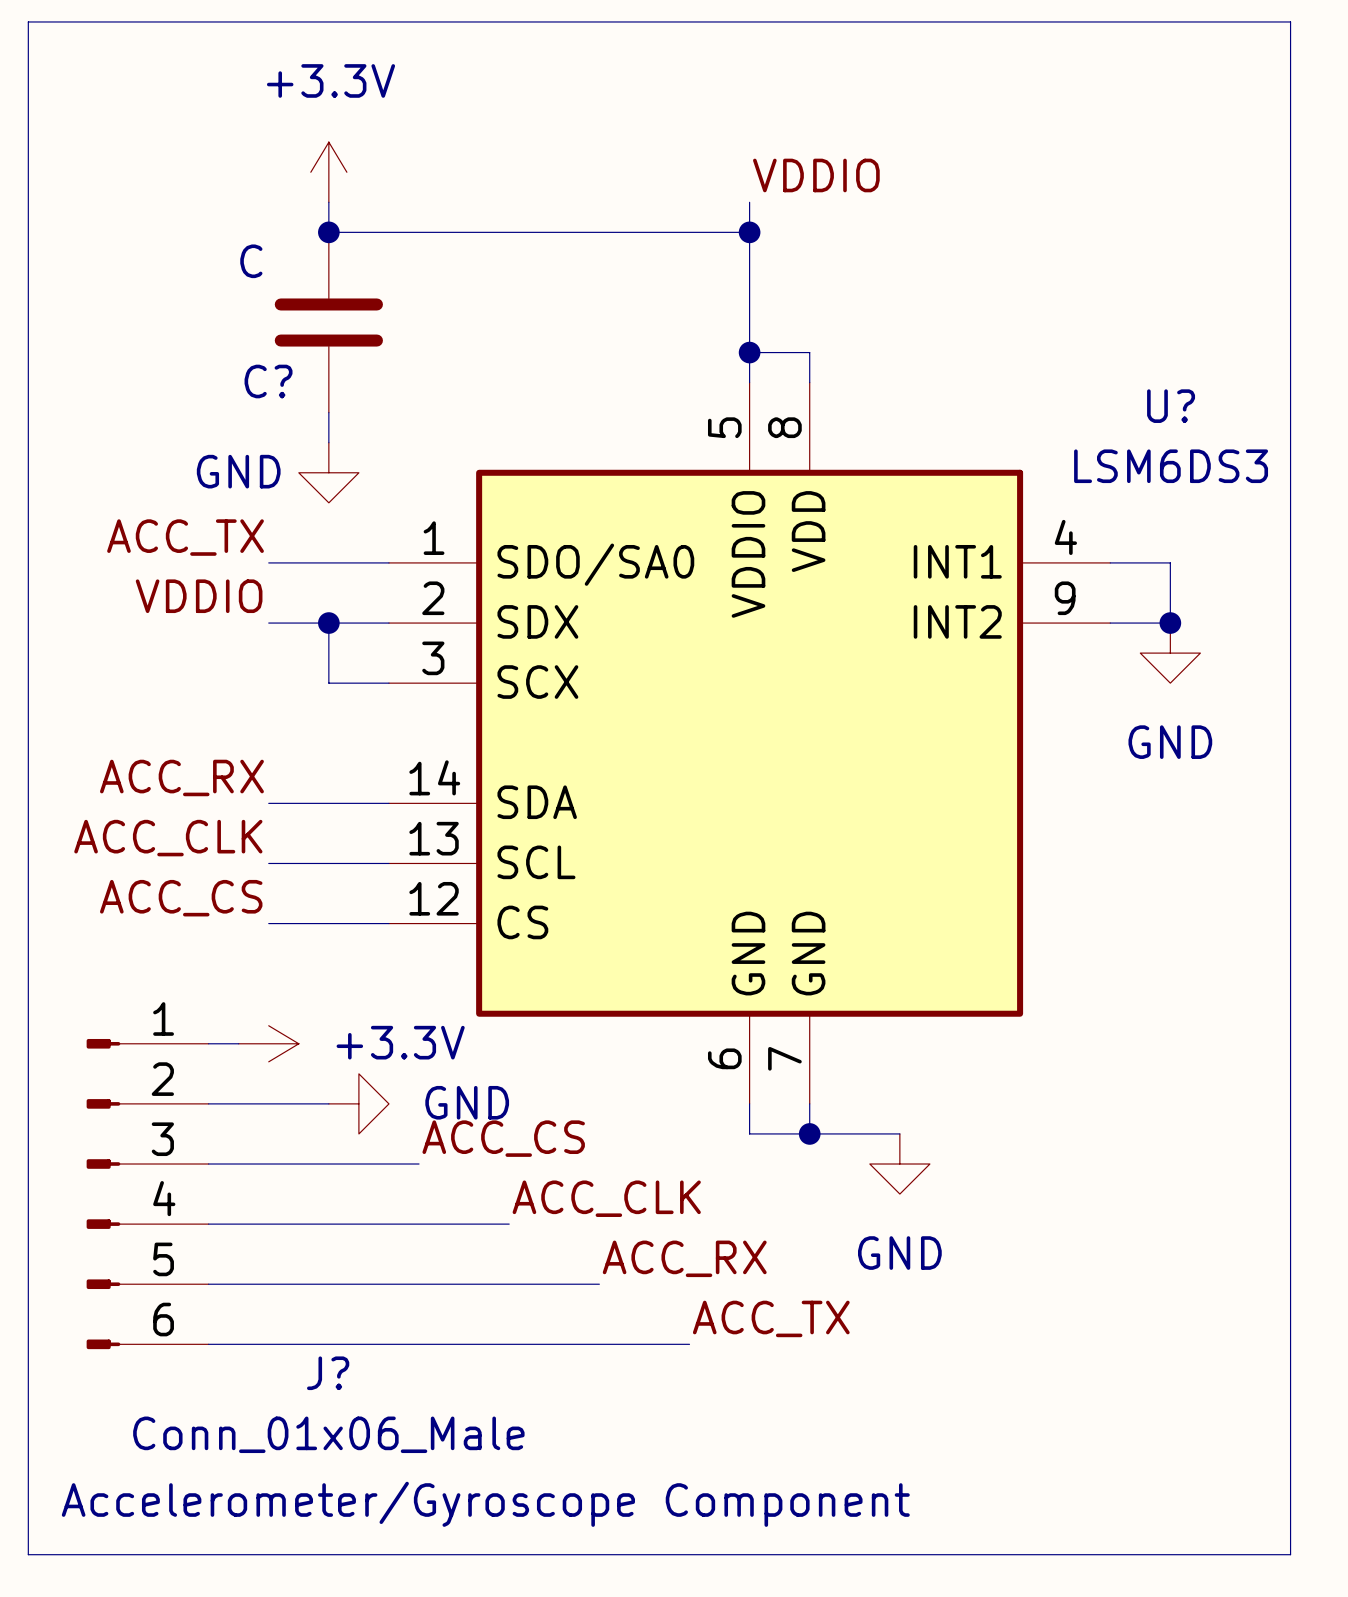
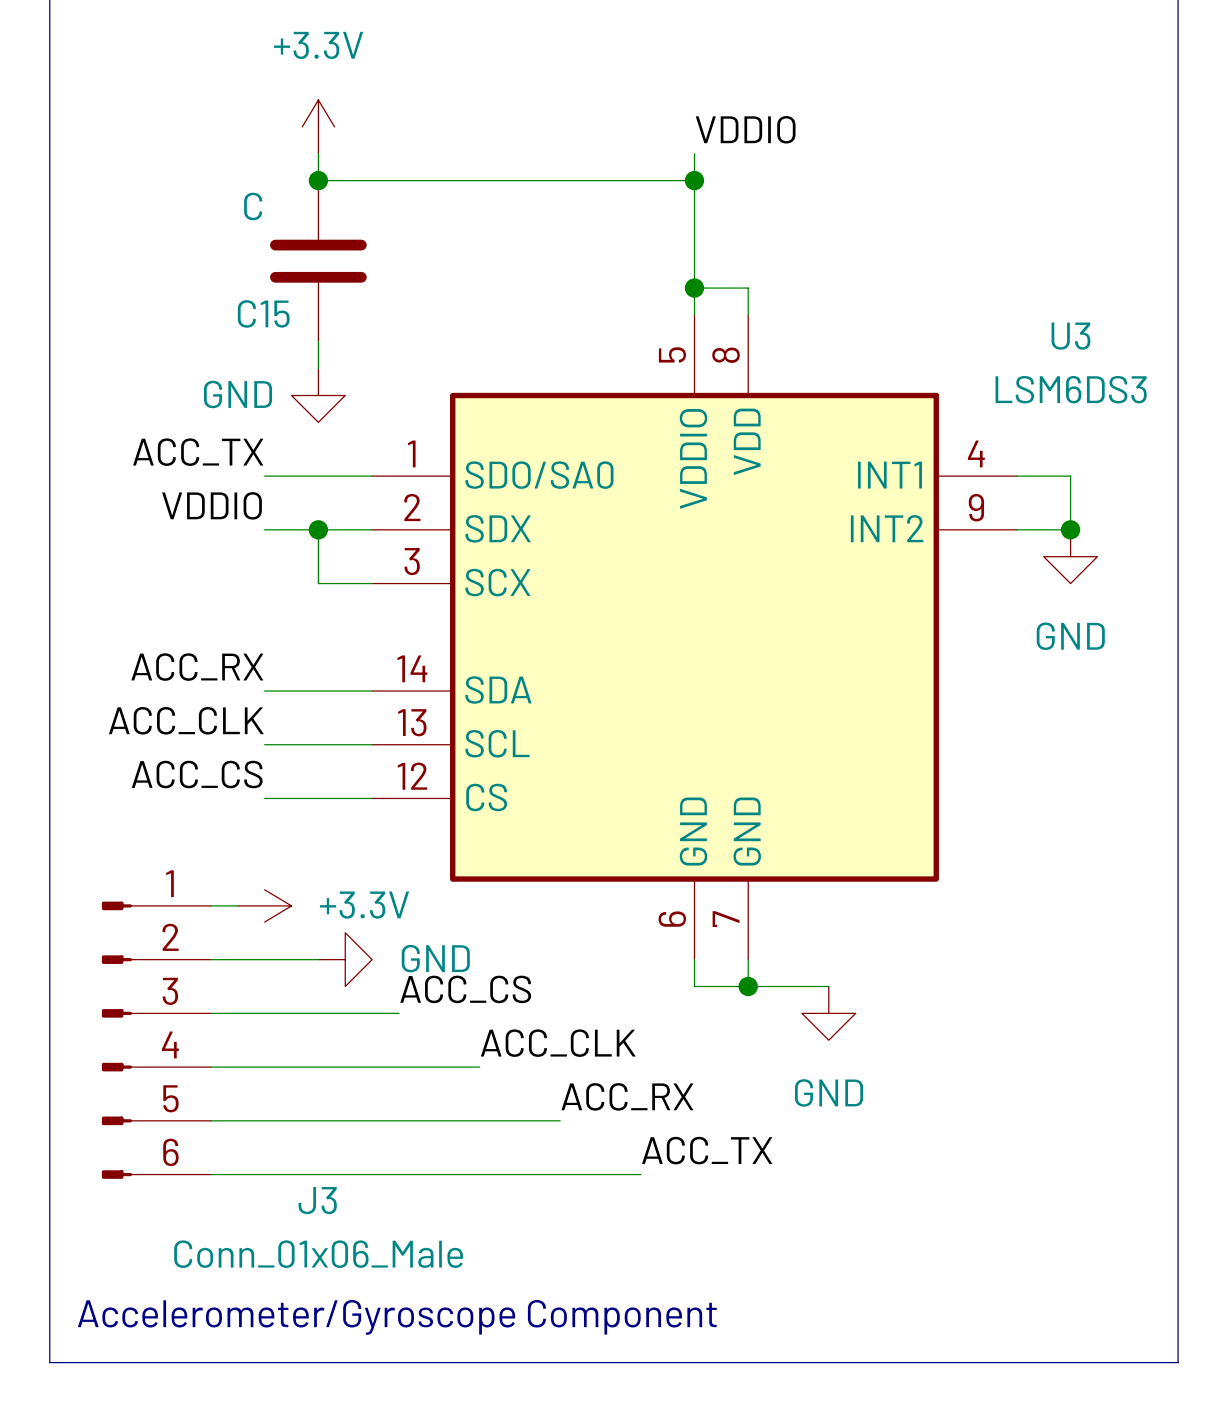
C? name: C? (268, 381) -> C15 (263, 313)
U? name: U? (1171, 406) -> U3 (1070, 336)
J? name: J? (328, 1373) -> J3 (317, 1200)

